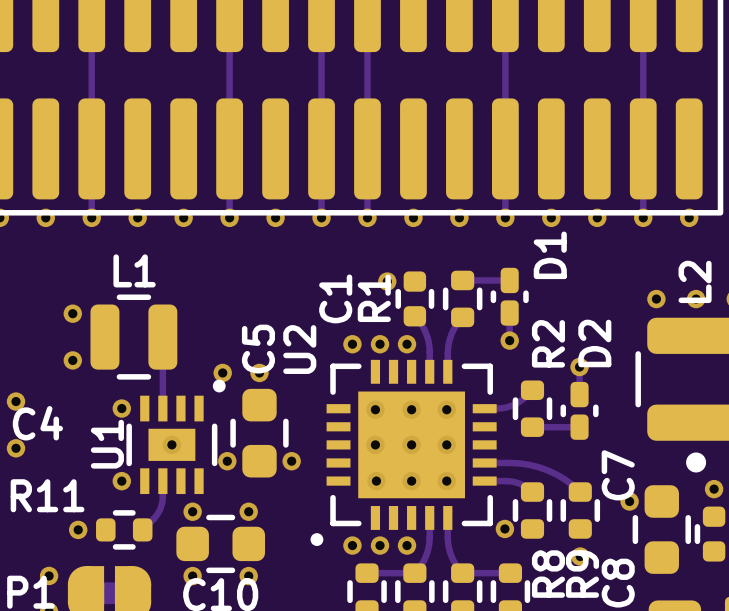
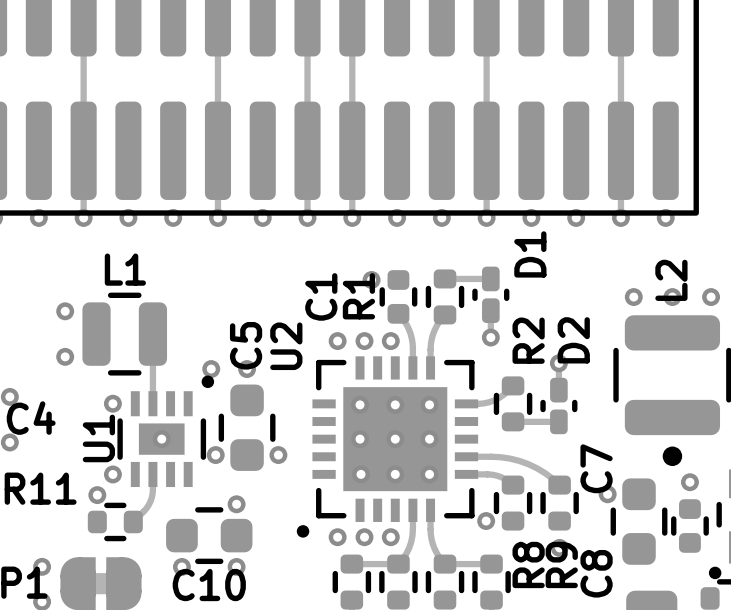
via: (192, 511) -> none
via position: (78, 529) -> (97, 495)

